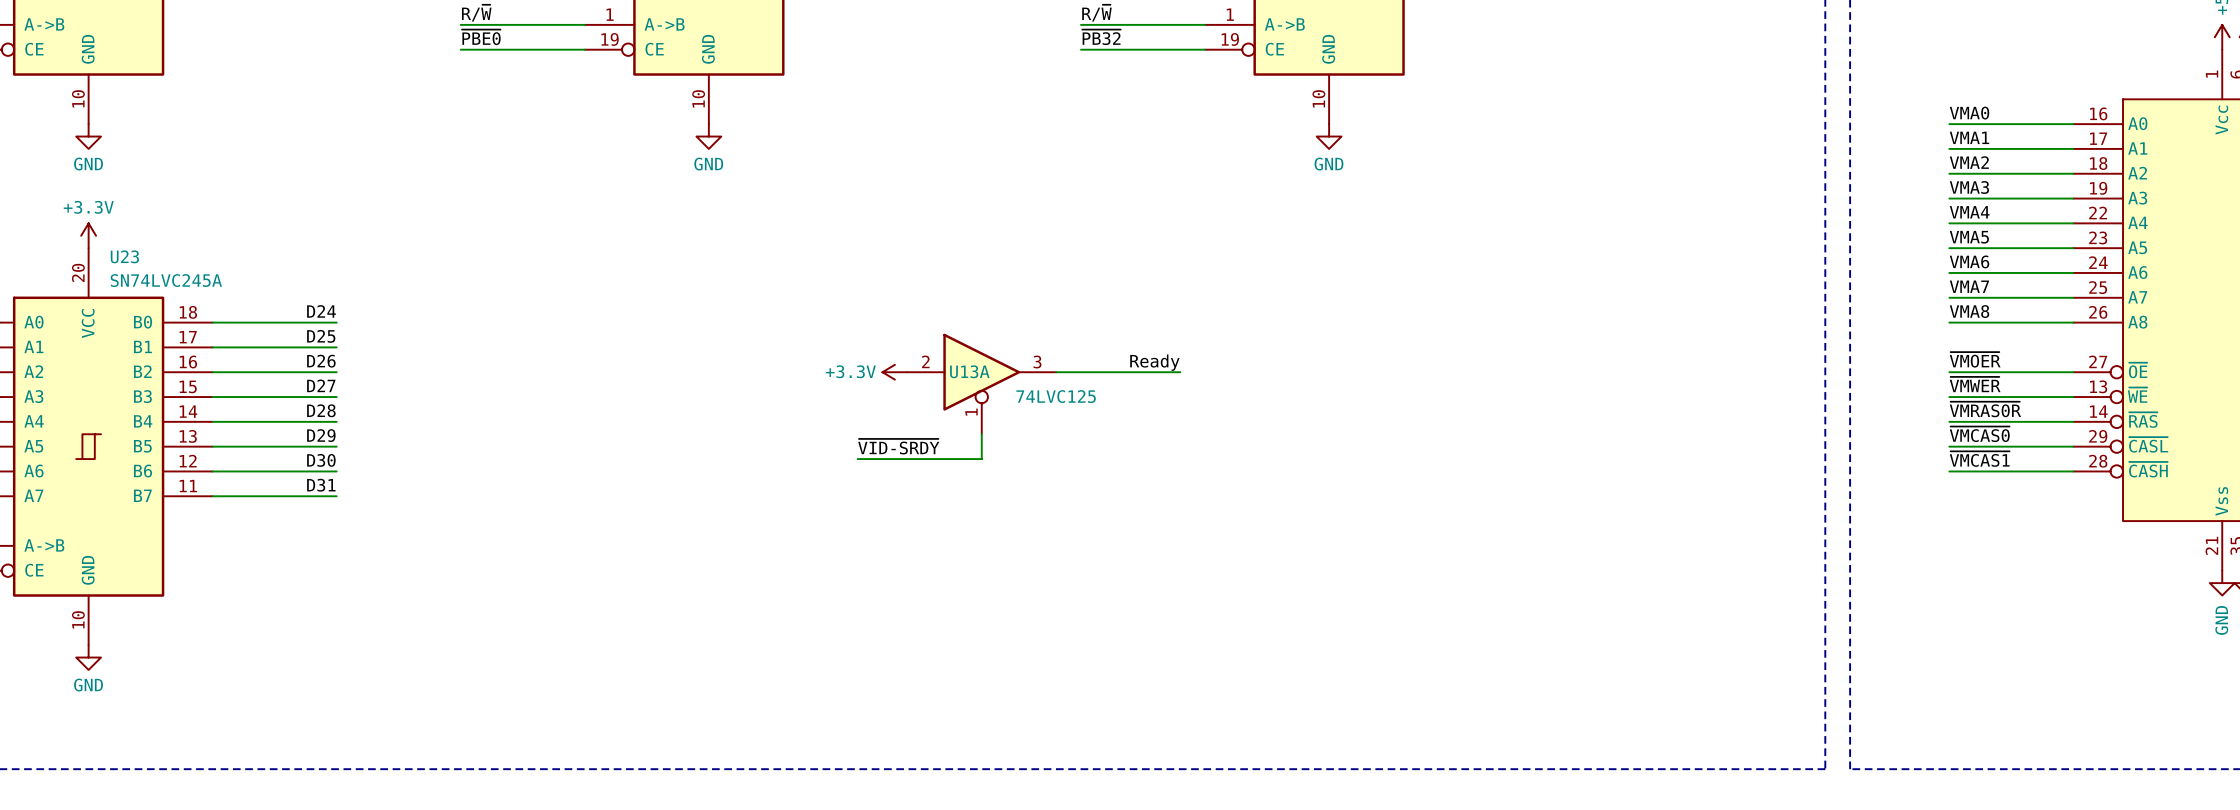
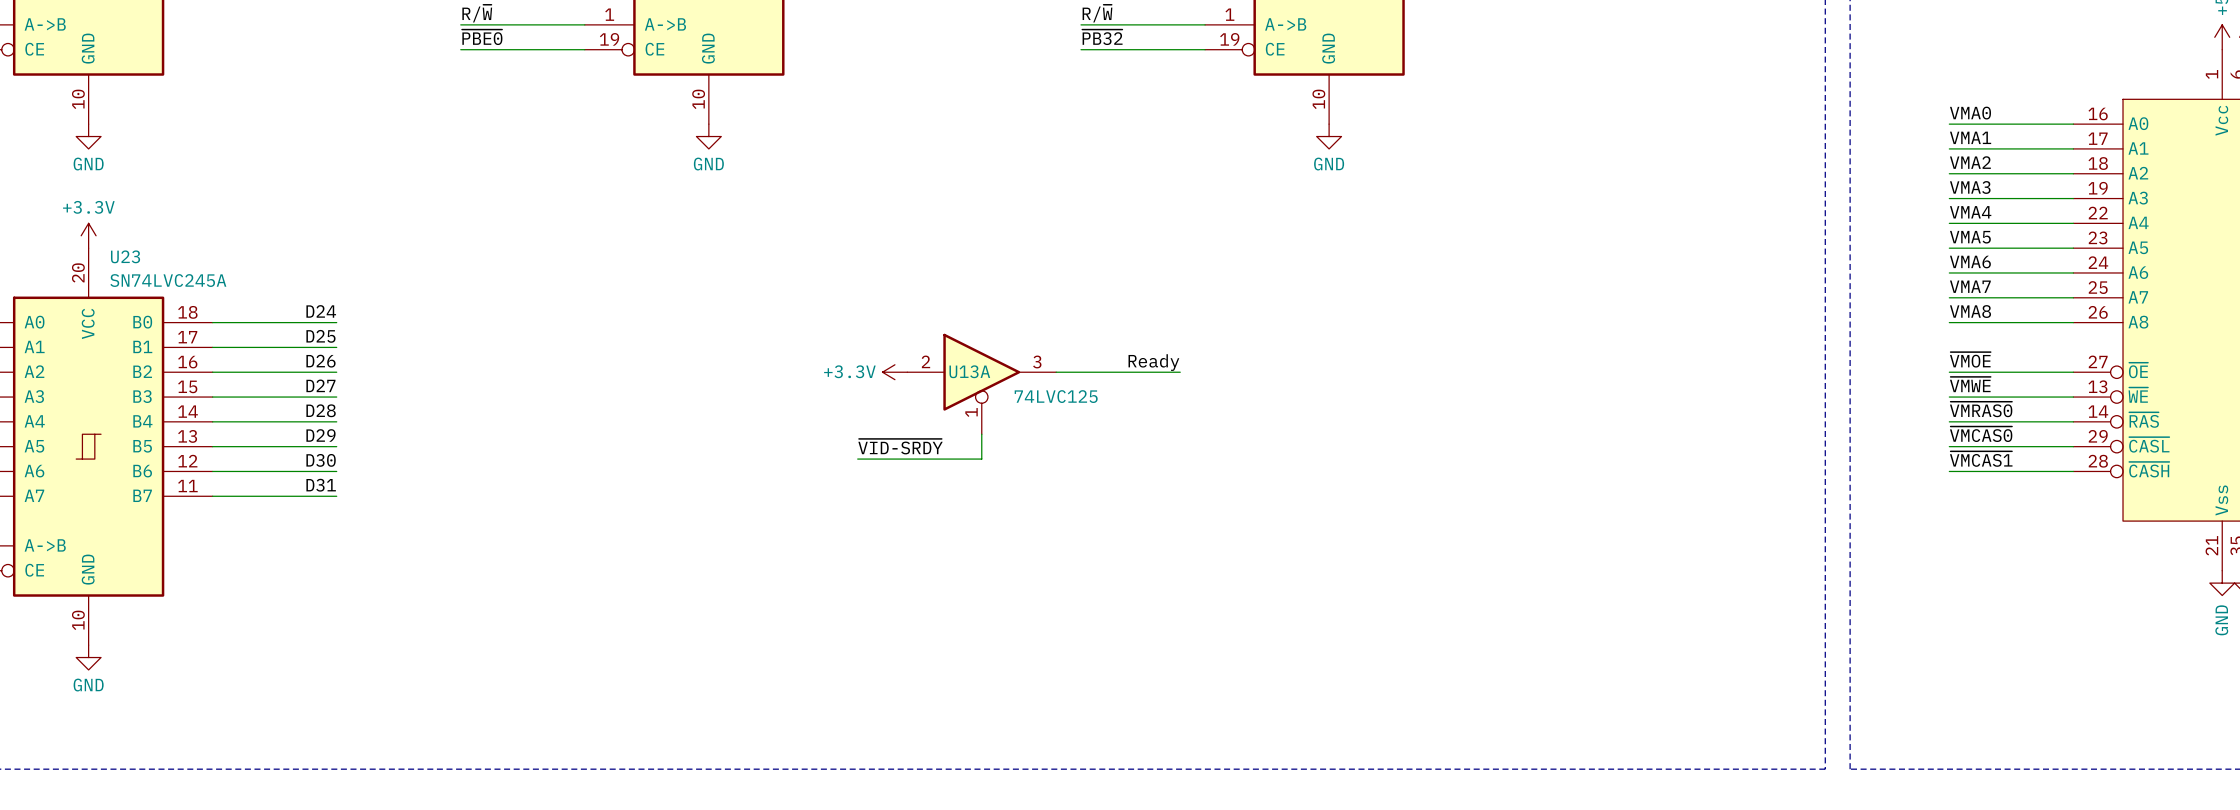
label: ~{VMOER} (1975, 359) -> ~{VMOE} (1970, 359)
label: ~{VMWER} (1975, 384) -> ~{VMWE} (1970, 384)
label: ~{VMRAS0R} (1985, 409) -> ~{VMRAS0} (1981, 409)

